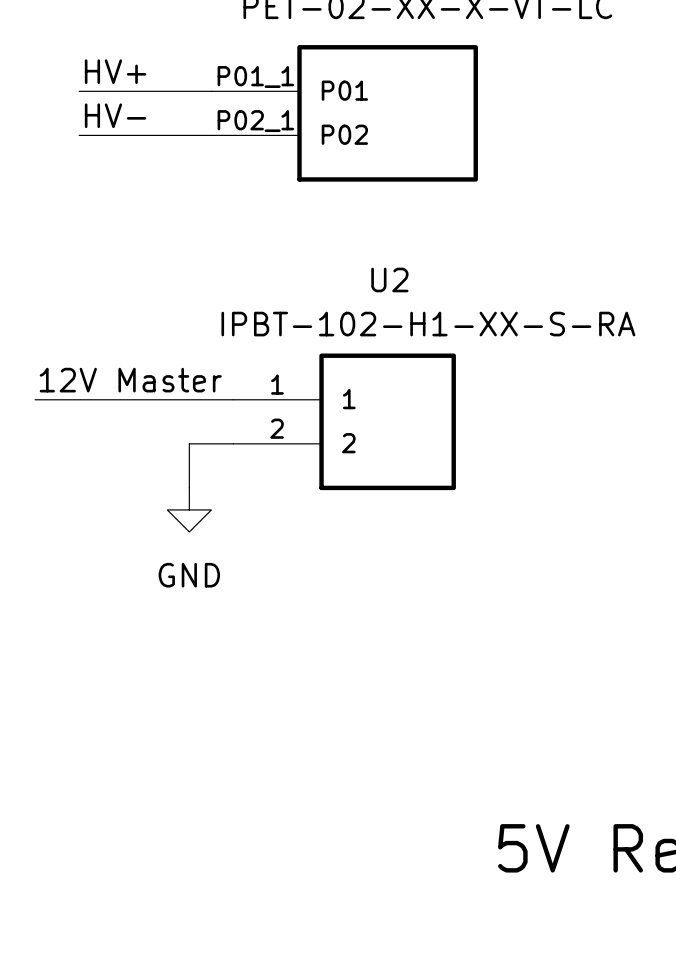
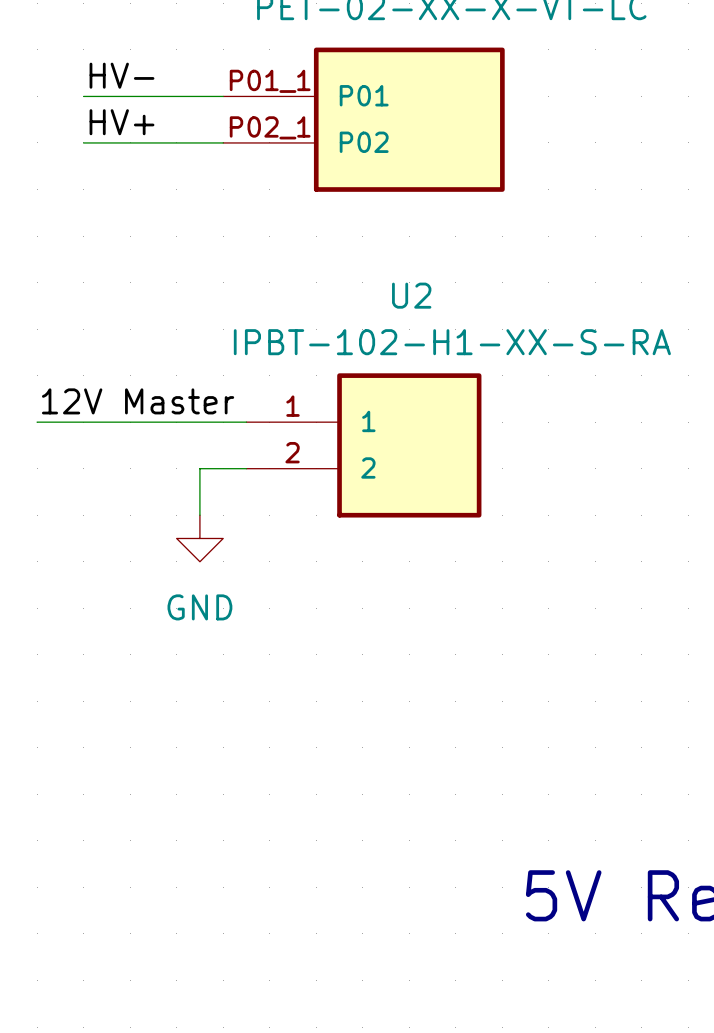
label: HV+ (115, 71) -> HV- (122, 75)
label: HV- (115, 115) -> HV+ (122, 122)

